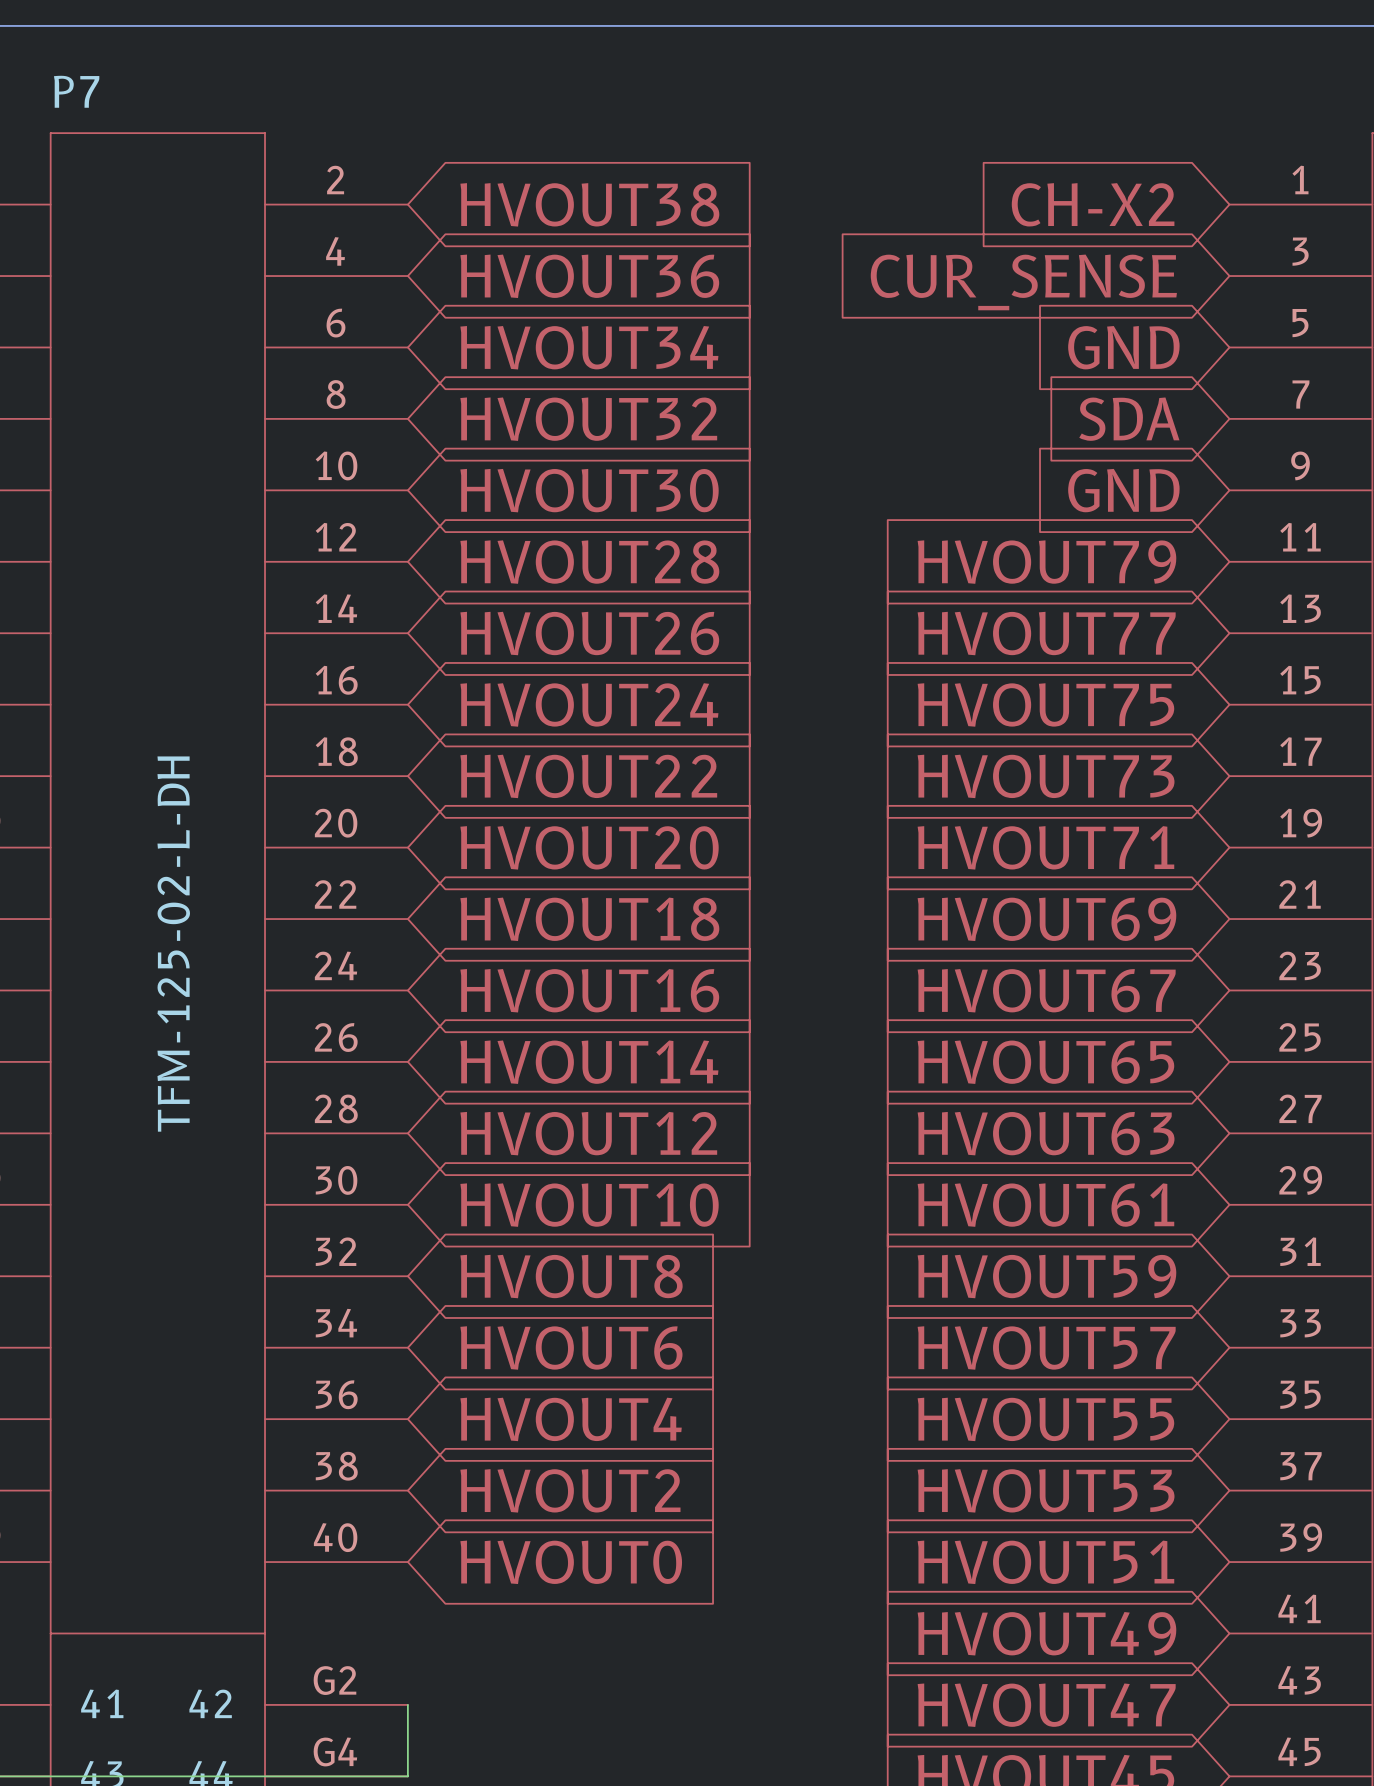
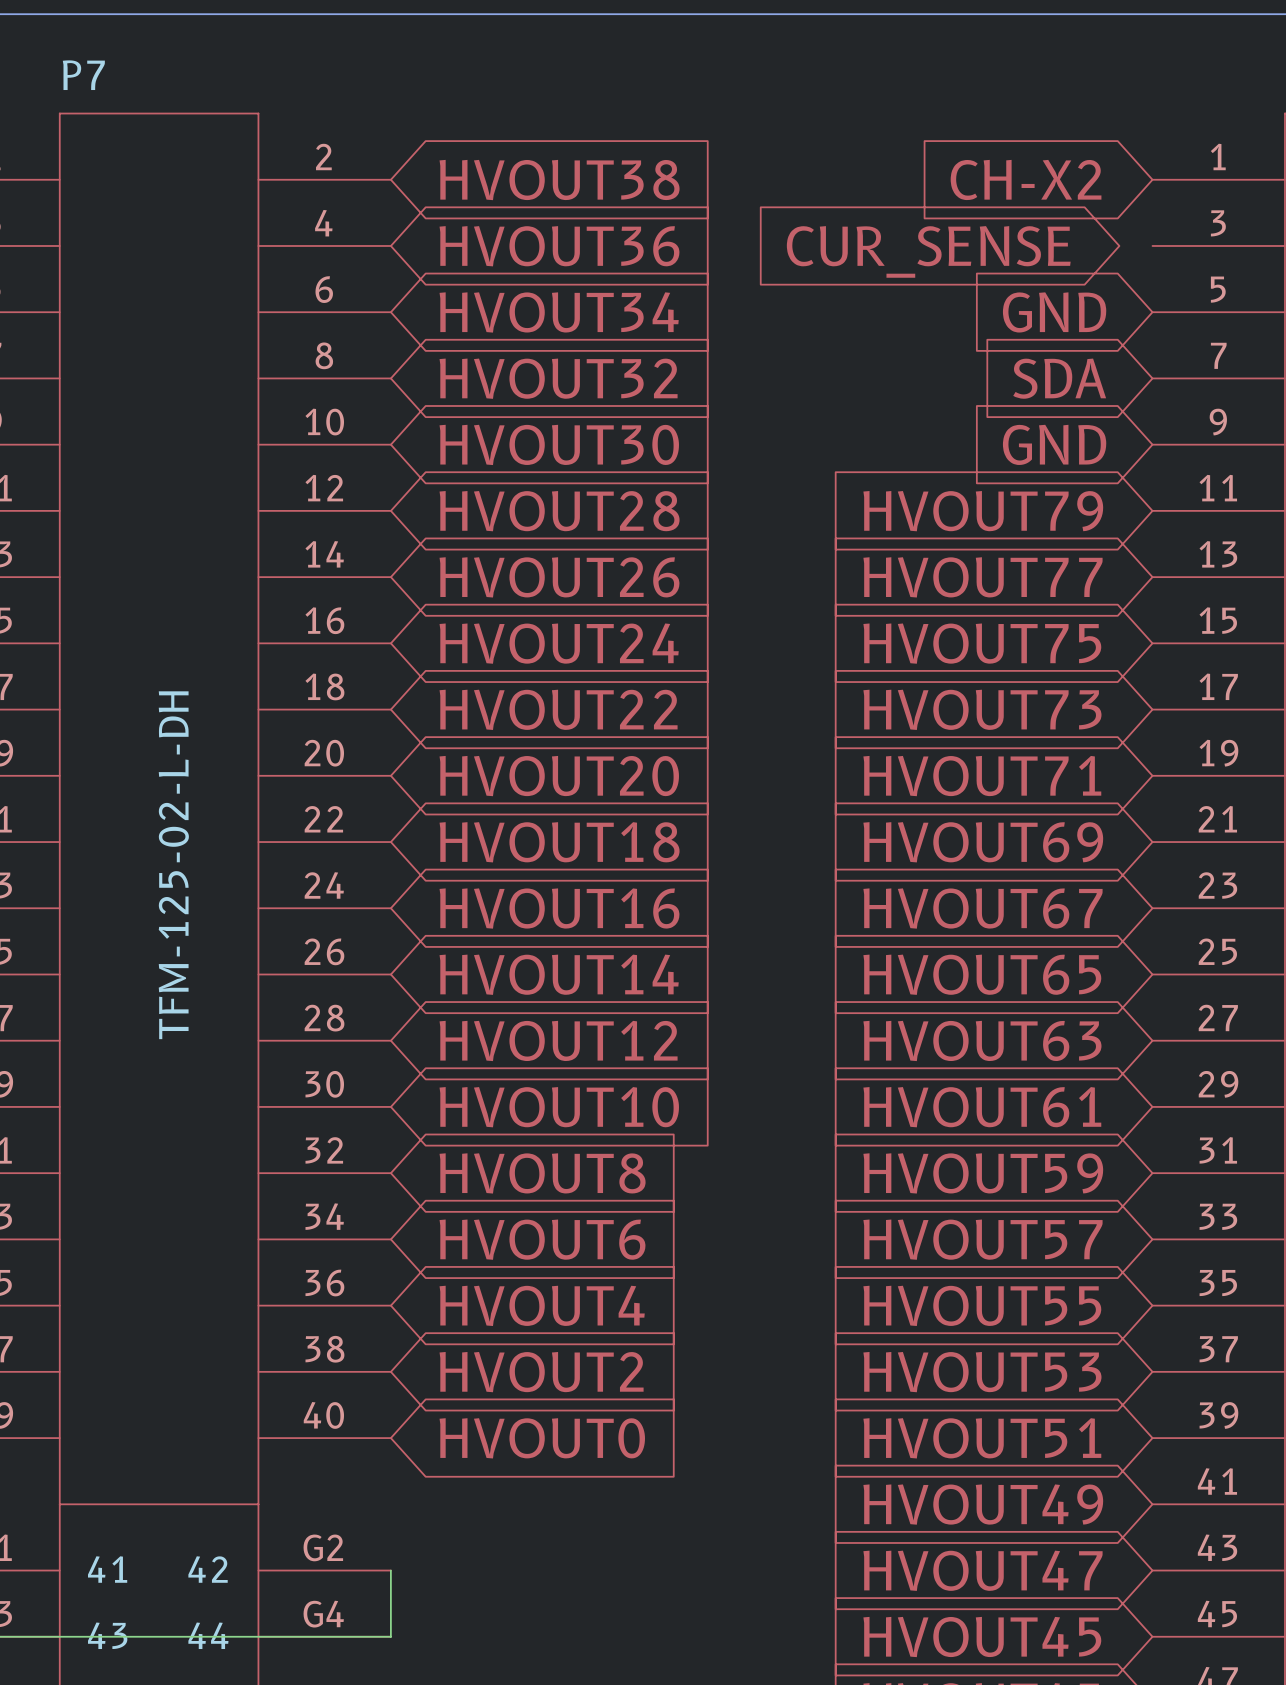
global label position: CUR_SENSE (1023, 282) -> CUR_SENSE (928, 251)

